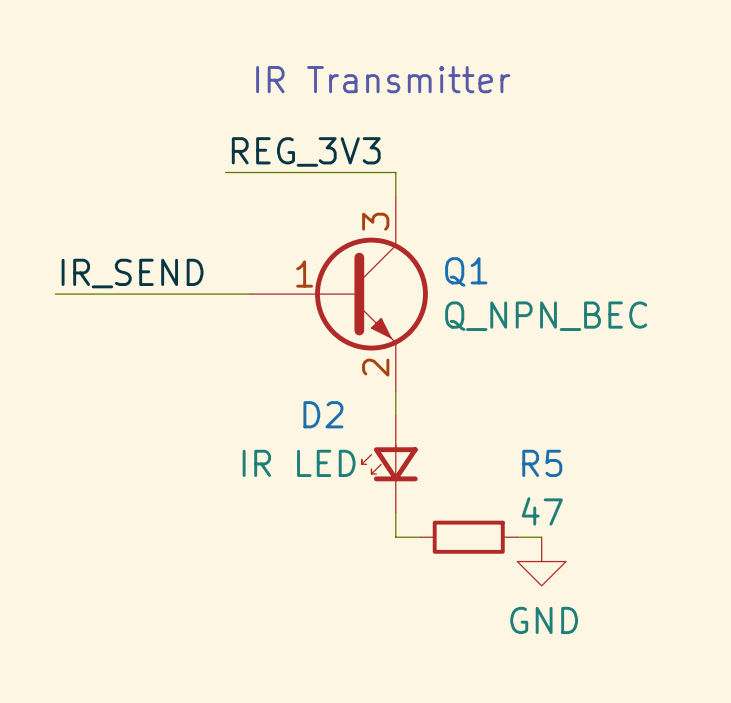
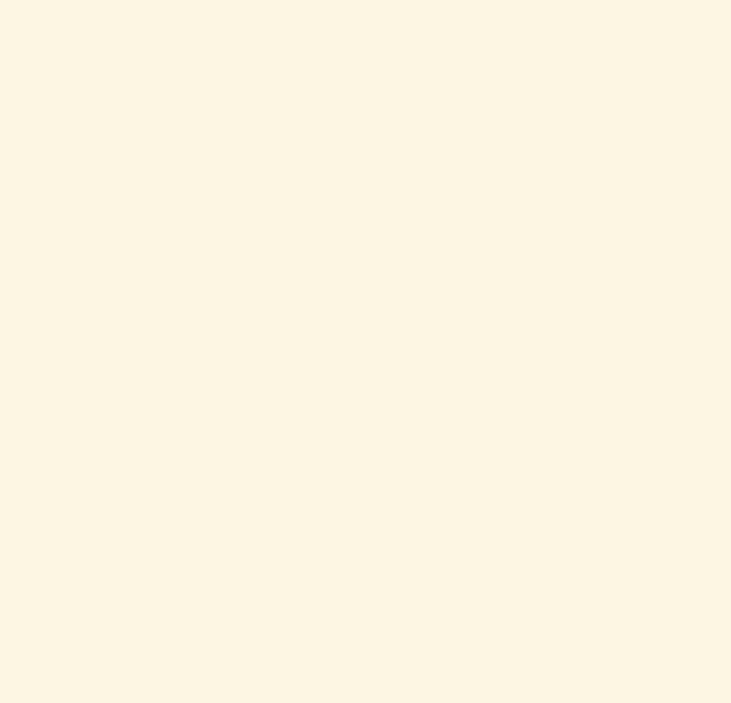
text: IR Transmitter (383, 79) -> none
label: REG_3V3 (306, 151) -> none
wire: (225, 172) (395, 172) (395, 196) -> none
label: IR_SEND (132, 273) -> none
wire: (55, 294) (249, 294) -> none
Q1: Q_NPN_BEC (338, 294) -> none
wire: (395, 391) (395, 415) -> none
D2: IR LED (389, 464) -> none
wire: (395, 512) (395, 537) (420, 537) -> none
R5: 47 (468, 537) -> none
wire: (517, 537) (541, 537) -> none
power symbol: GND (541, 561) -> none

